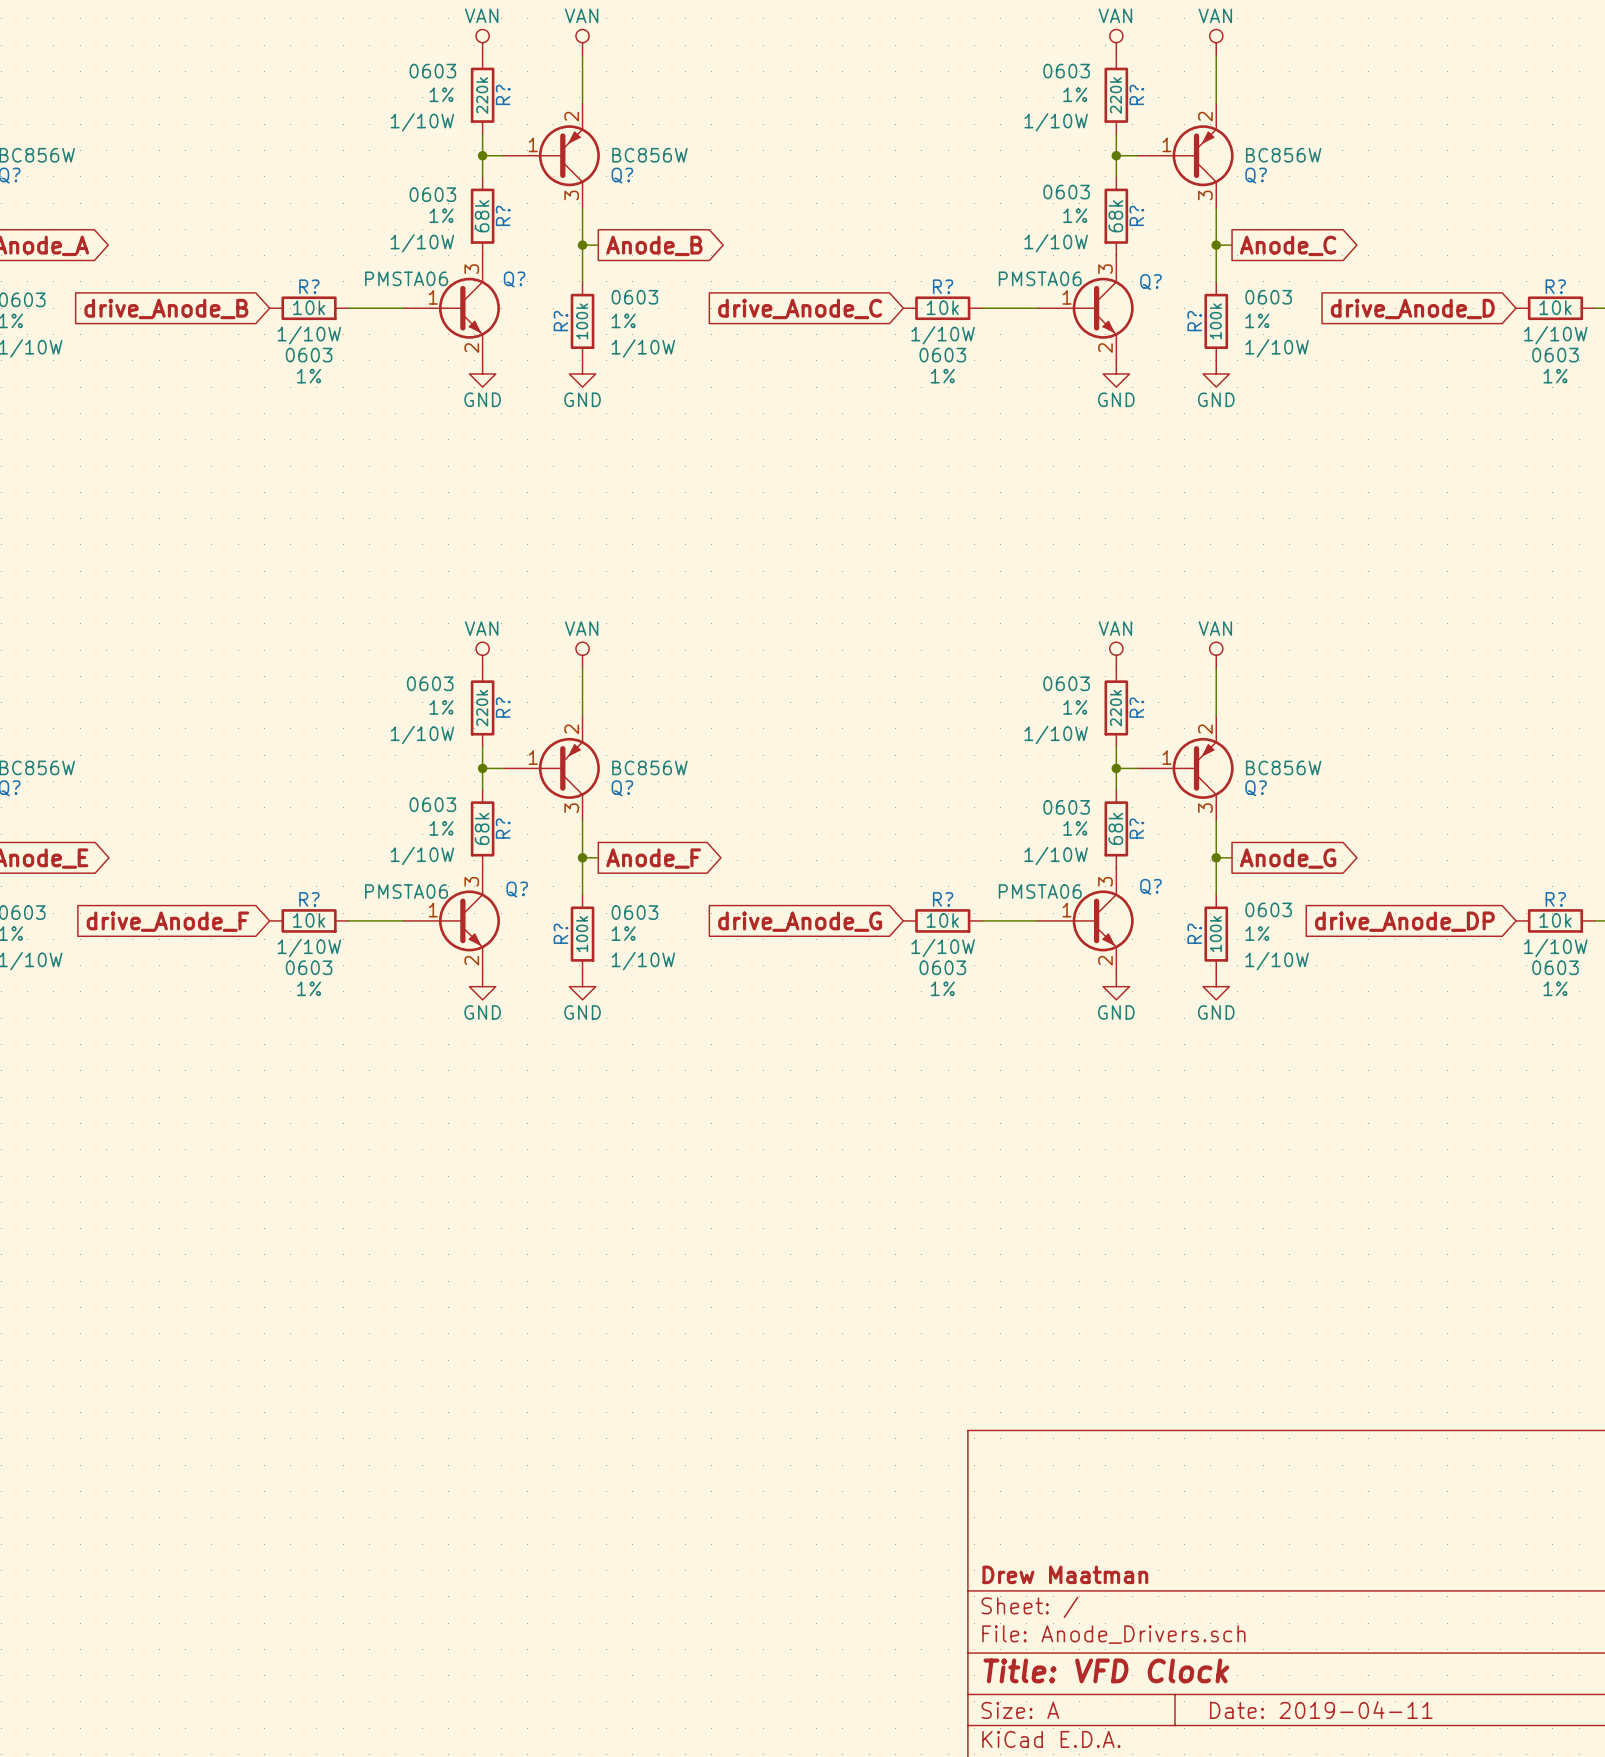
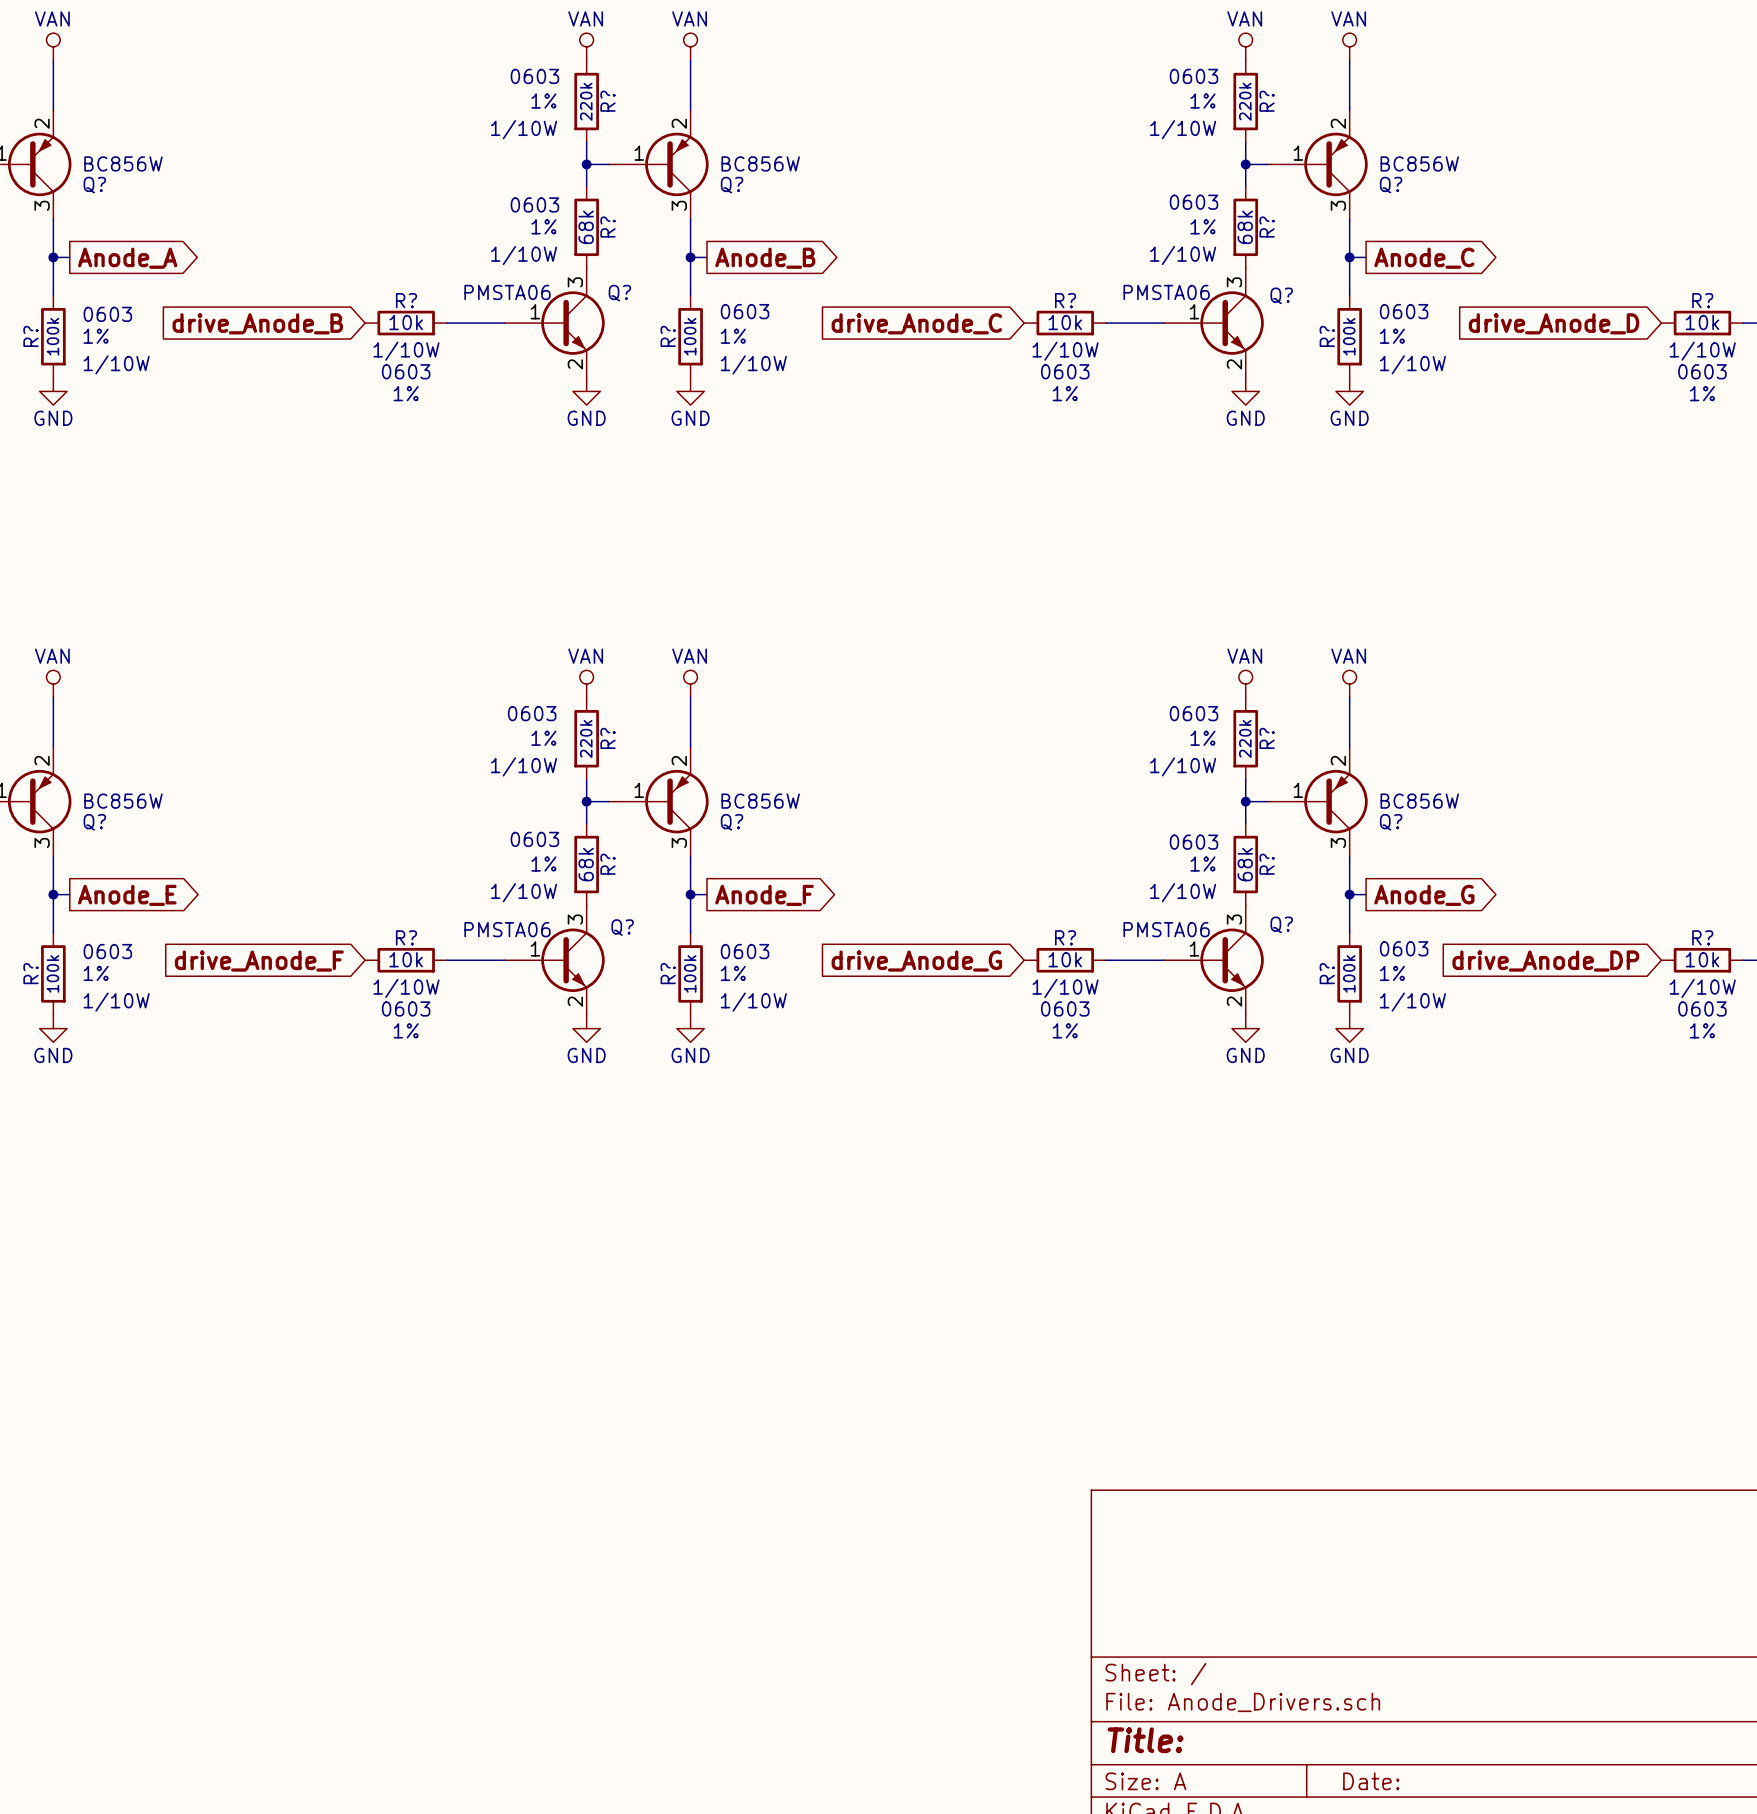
title block: Drew Maatman (1065, 1574) -> none
title block: Title: VFD Clock (1106, 1670) -> Title: (1145, 1740)
title block: Date: 2019-04-11 (1321, 1710) -> Date: (1371, 1781)

